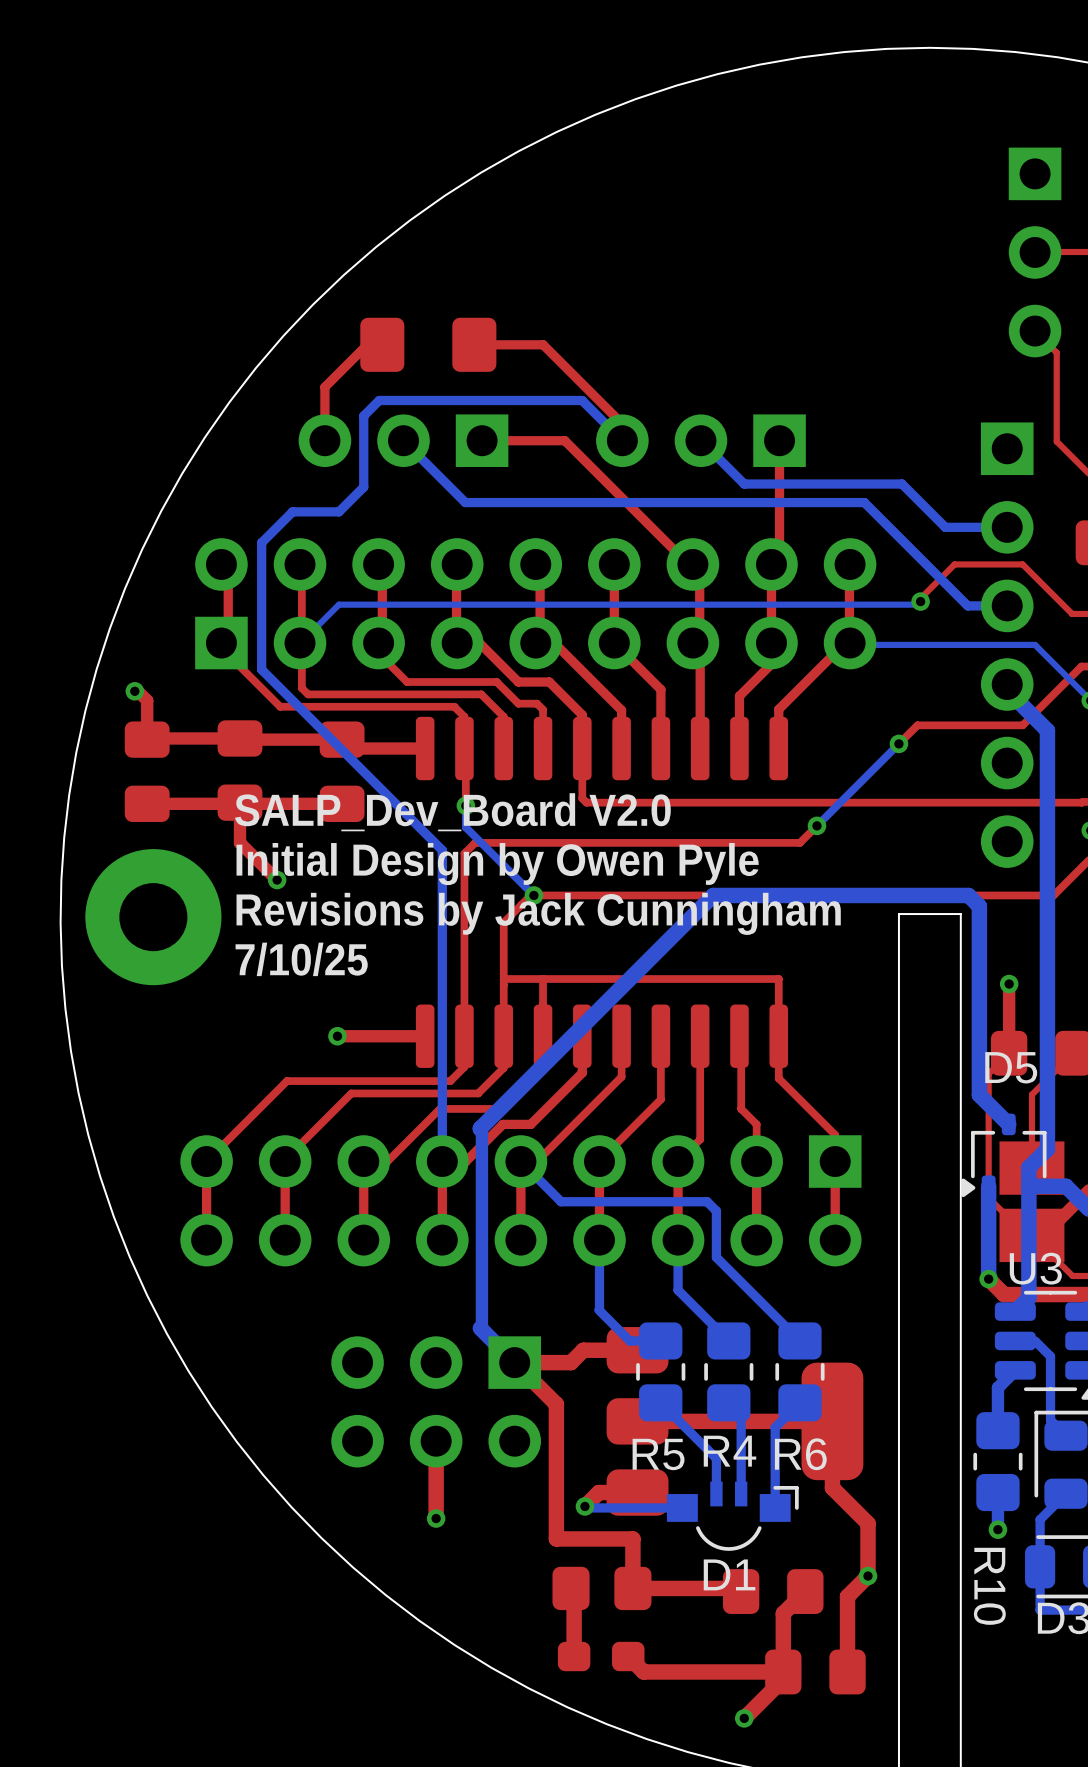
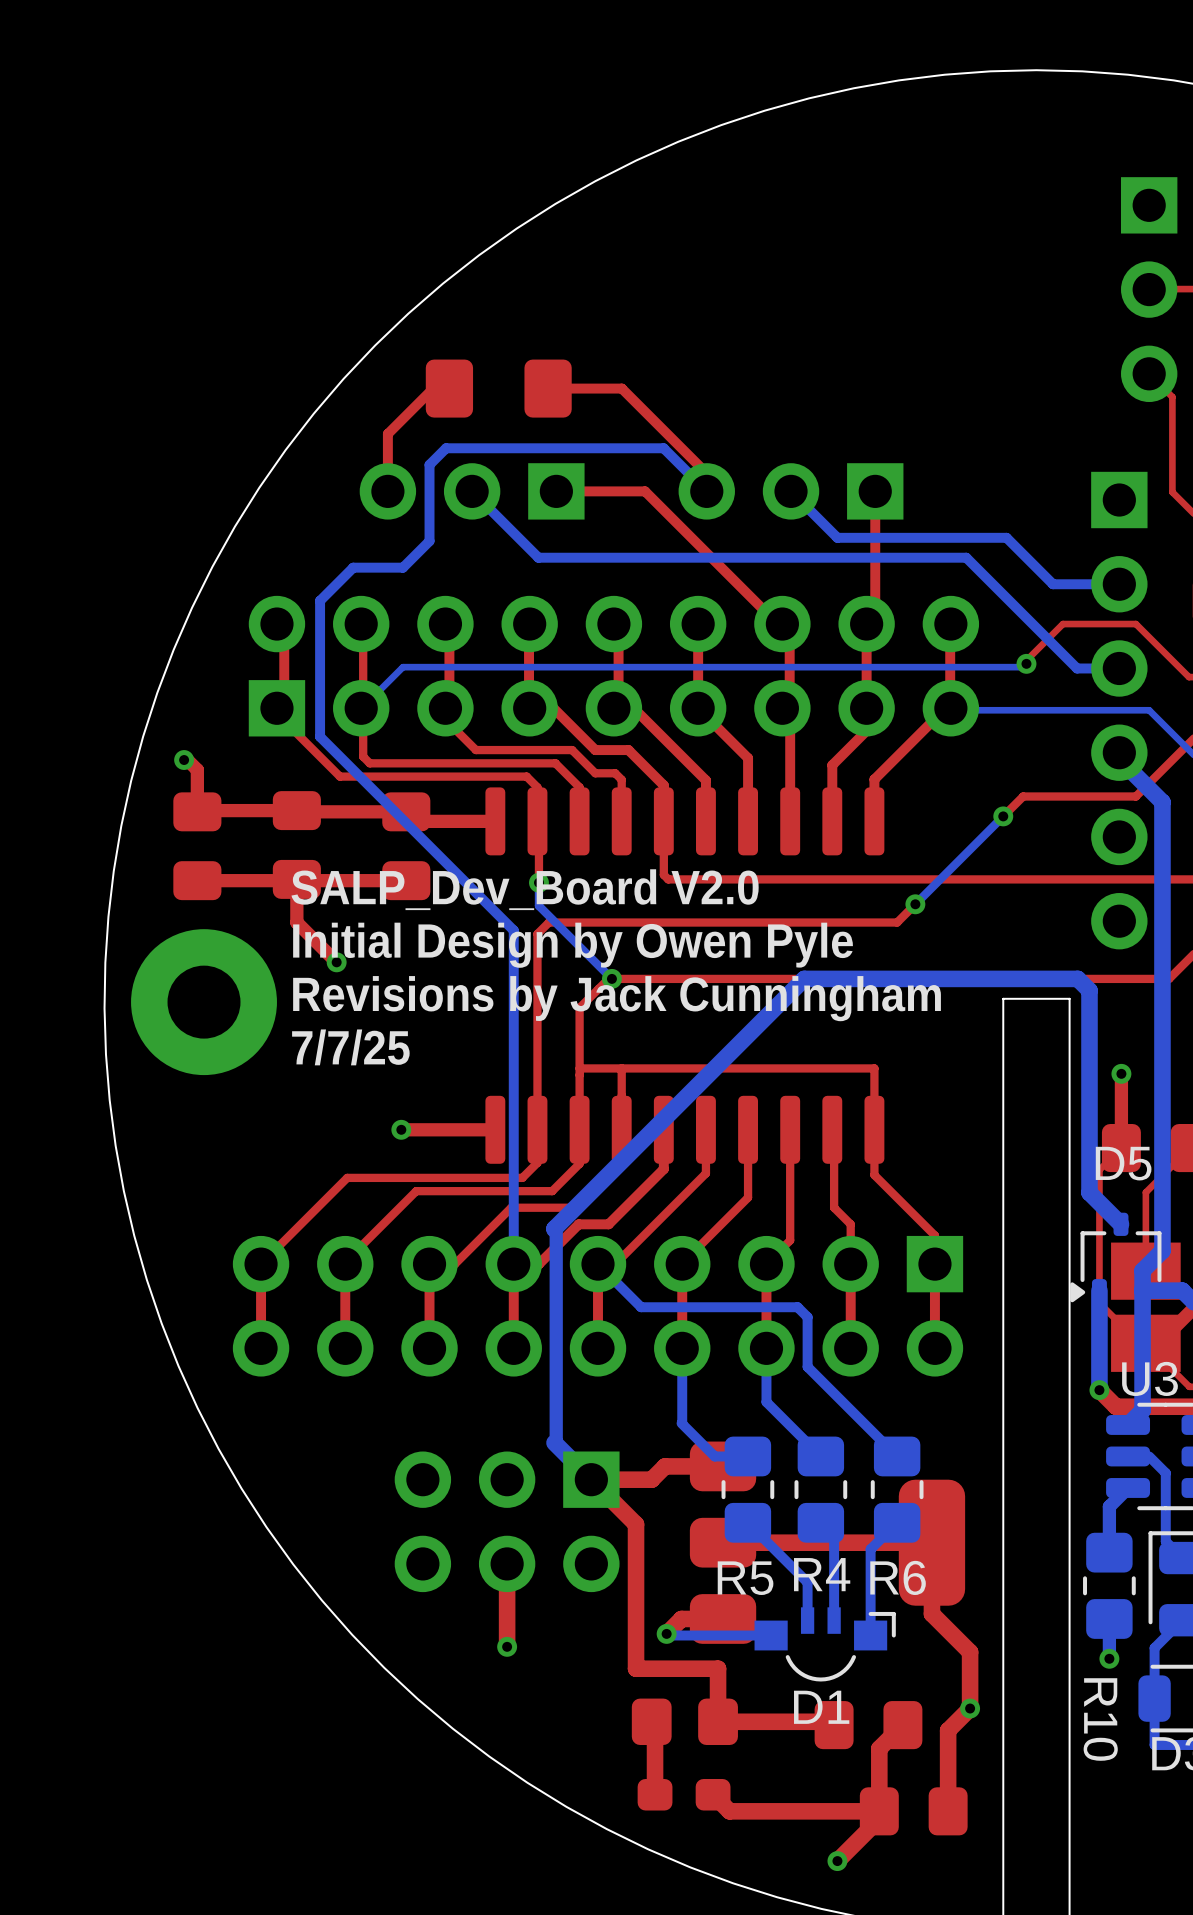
text: 7/10/25 (301, 959) -> 7/7/25 (350, 1047)

